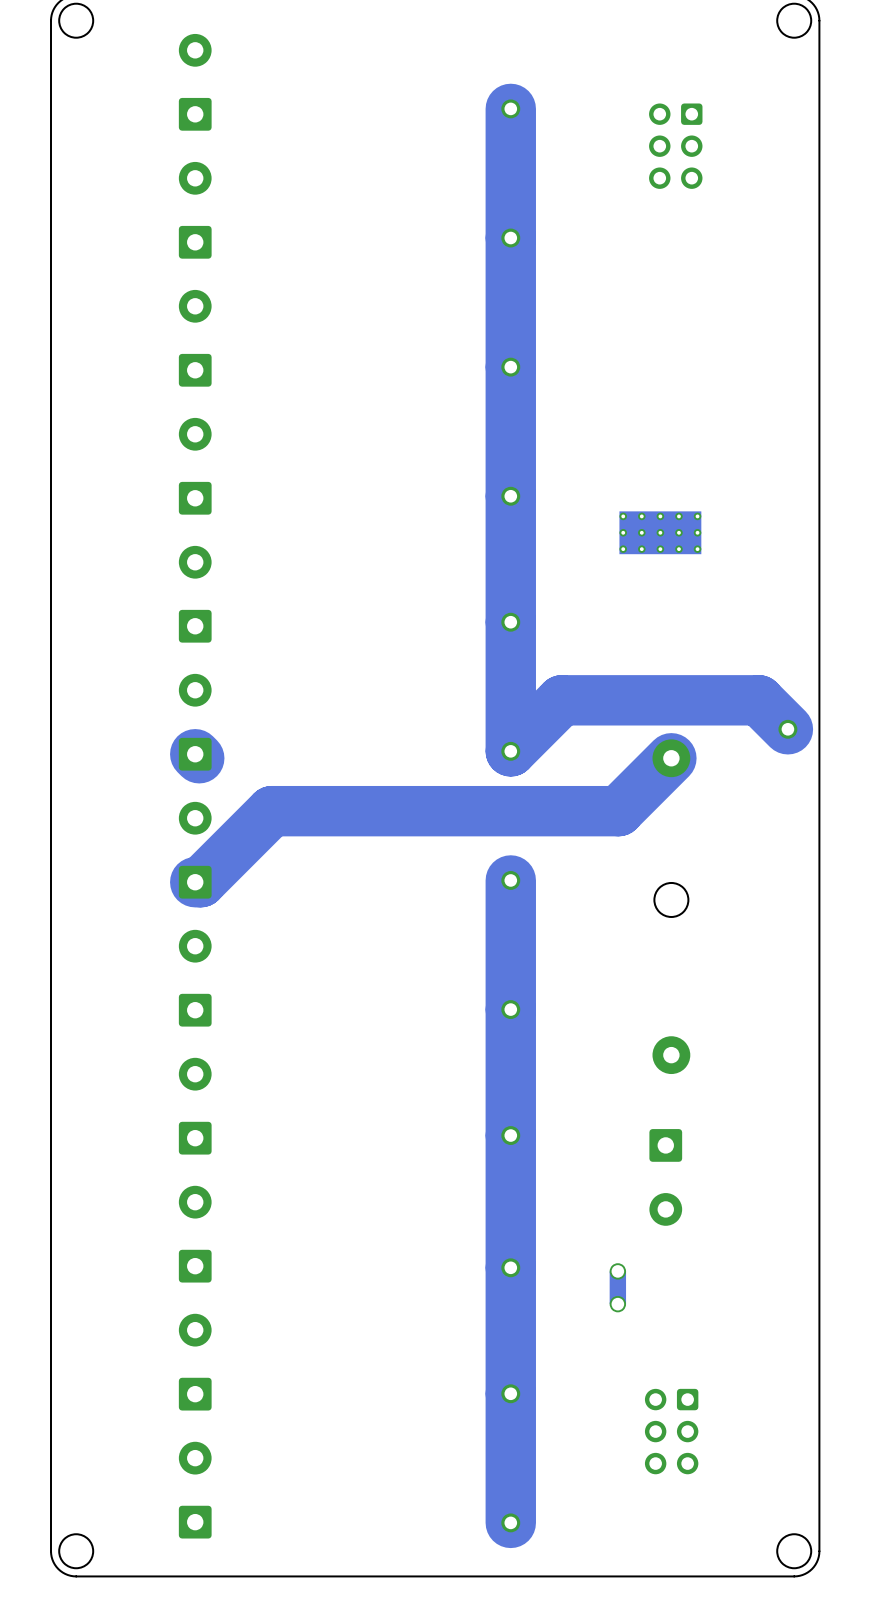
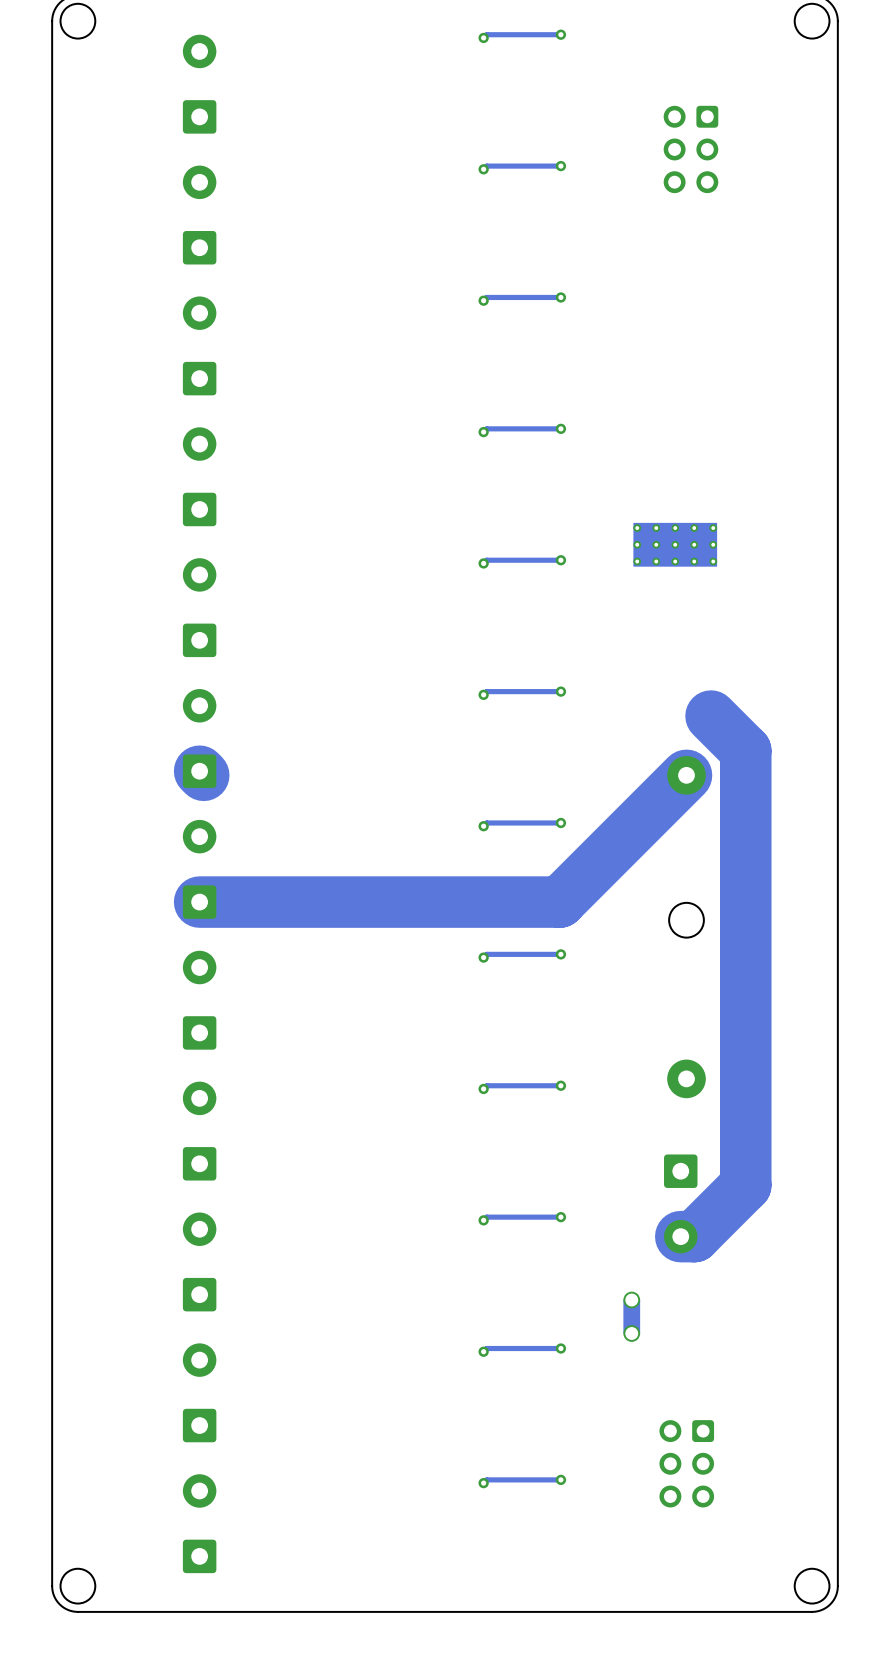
track: none -> (560, 34) (486, 34) (483, 37)
via: none -> (560, 34)
via: none -> (483, 37)
track: (510, 108) (510, 751) (561, 700) (758, 700) (787, 729) -> none
via: (510, 108) -> none
track: none -> (560, 166) (486, 166) (483, 169)
via: none -> (560, 166)
via: none -> (483, 169)
via: (510, 238) -> none
track: none -> (560, 297) (486, 297) (483, 300)
via: none -> (560, 297)
via: none -> (483, 300)
via: (510, 367) -> none
track: none -> (560, 428) (486, 428) (483, 432)
via: none -> (560, 428)
via: none -> (483, 432)
via: (510, 496) -> none
track: none -> (560, 560) (486, 560) (483, 563)
via: none -> (560, 560)
via: none -> (483, 563)
via: (510, 622) -> none
track: none -> (560, 691) (486, 691) (483, 694)
via: none -> (560, 691)
via: none -> (483, 694)
track: none -> (711, 716) (745, 750) (745, 1185) (694, 1236) (680, 1236)
via: (787, 729) -> none
via: (510, 751) -> none
track: none -> (560, 822) (486, 822) (483, 826)
via: none -> (560, 822)
via: none -> (483, 826)
track: (618, 811) (271, 811) (200, 882) -> (632, 829) (559, 902) (205, 902)
track: (510, 880) (510, 1522) -> none
via: (510, 880) -> none
track: none -> (560, 954) (486, 954) (483, 957)
via: none -> (560, 954)
via: none -> (483, 957)
via: (510, 1009) -> none
track: none -> (560, 1085) (486, 1085) (483, 1088)
via: none -> (560, 1085)
via: none -> (483, 1088)
via: (510, 1135) -> none
track: none -> (560, 1217) (486, 1217) (483, 1220)
via: none -> (560, 1217)
via: none -> (483, 1220)
via: (510, 1267) -> none
track: none -> (560, 1348) (486, 1348) (483, 1351)
via: none -> (560, 1348)
via: none -> (483, 1351)
via: (510, 1393) -> none
track: none -> (560, 1479) (486, 1479) (483, 1483)
via: none -> (560, 1479)
via: none -> (483, 1483)
via: (510, 1522) -> none

